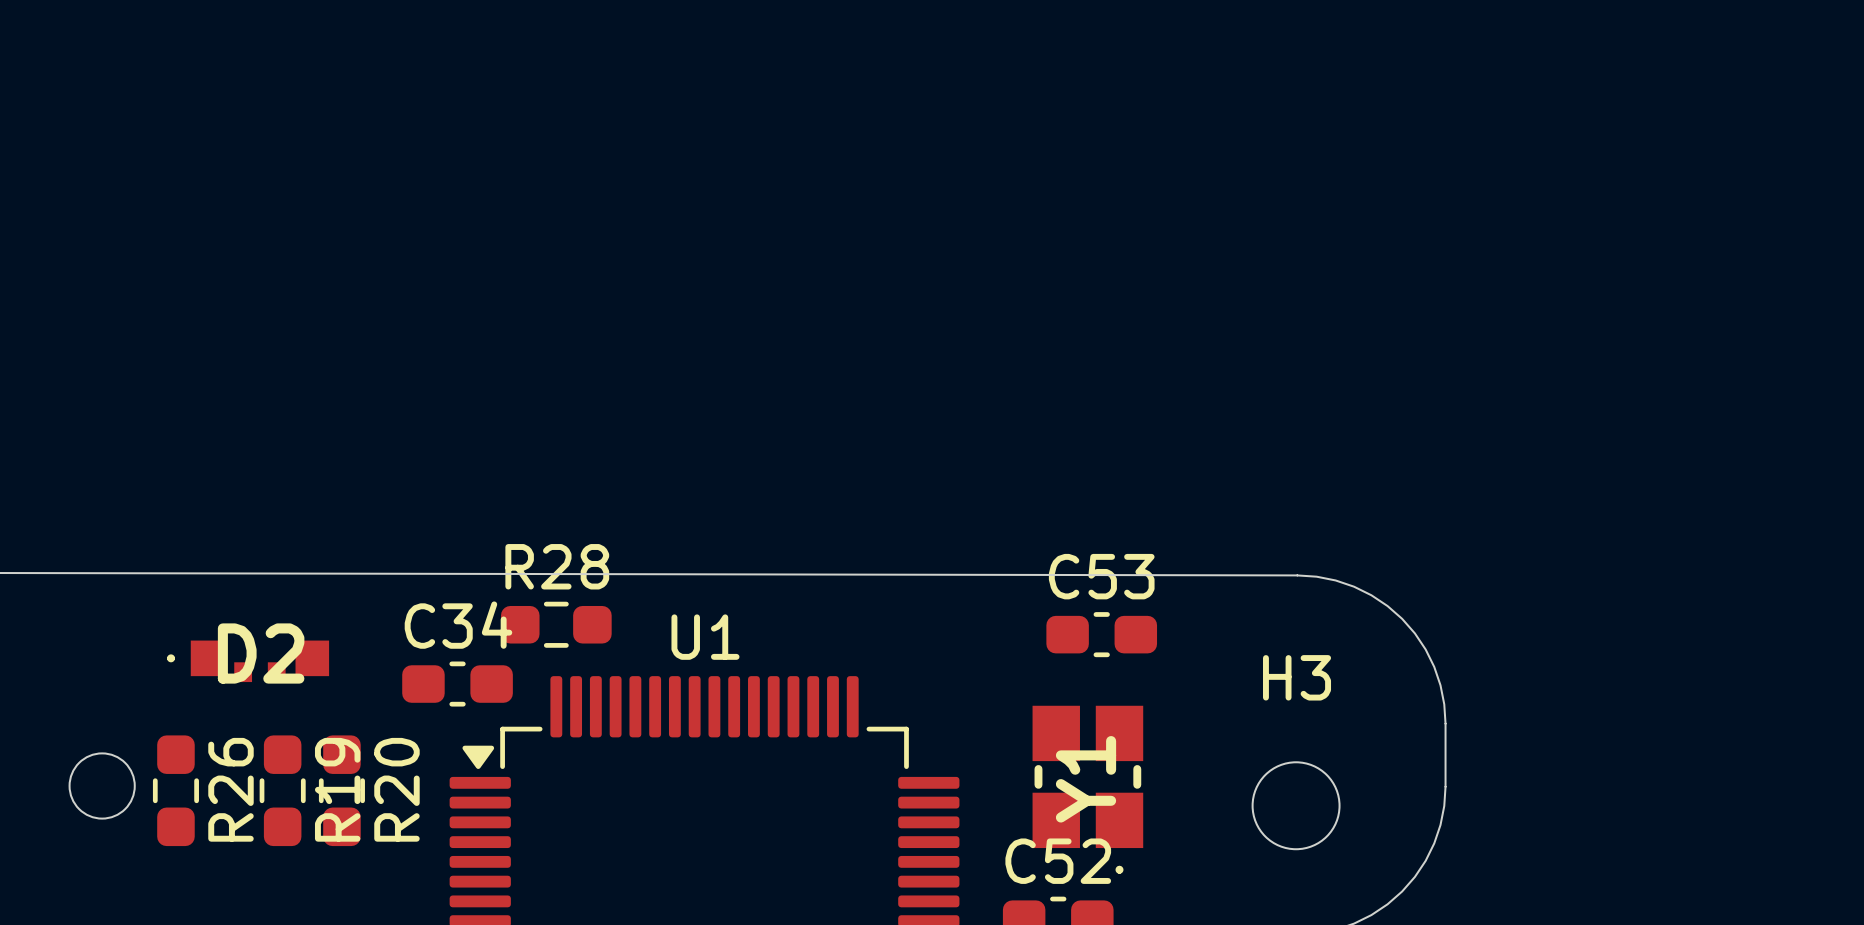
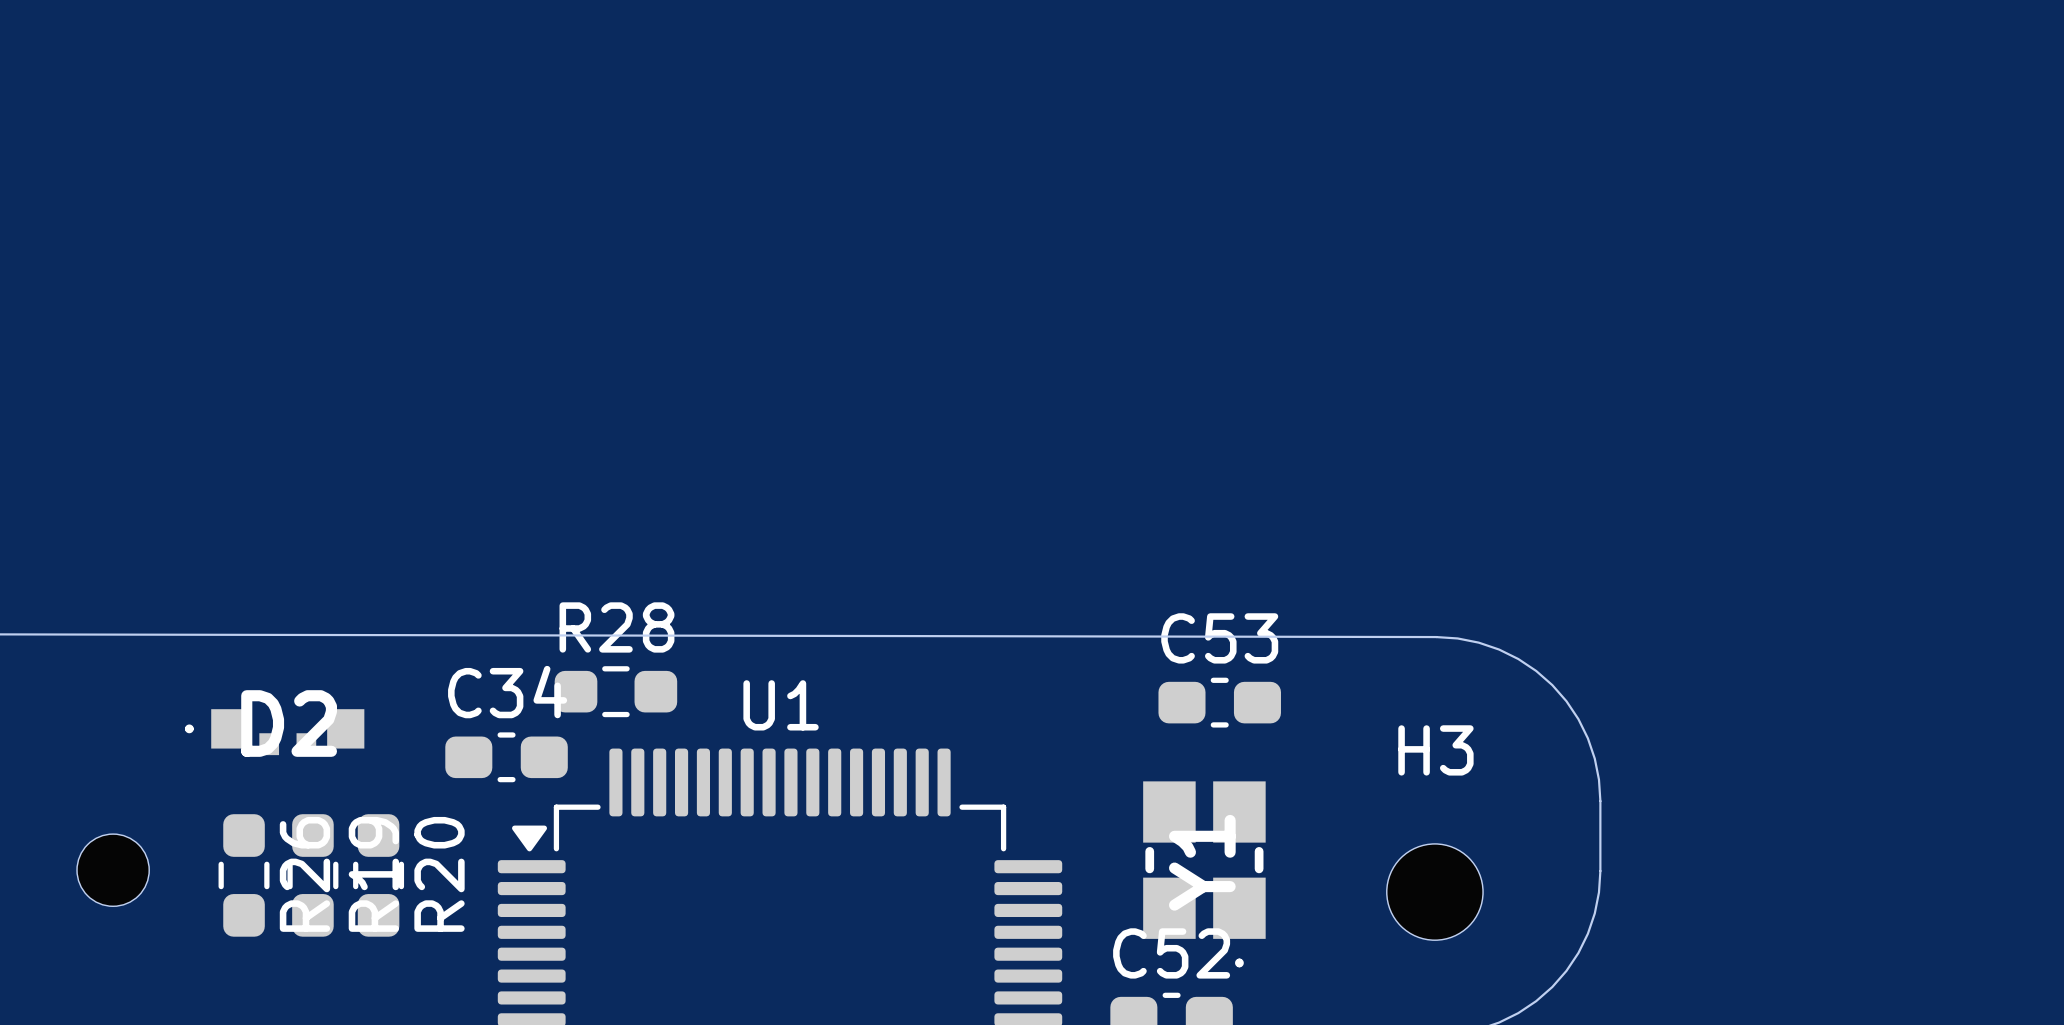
R26 position: (175, 790) -> (244, 875)

